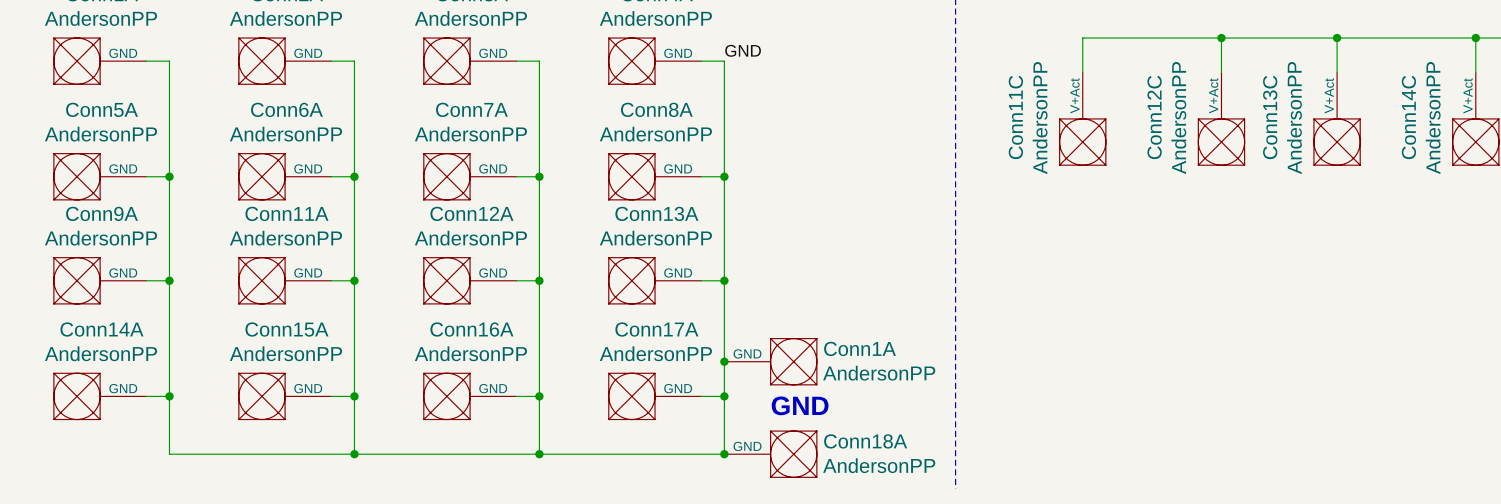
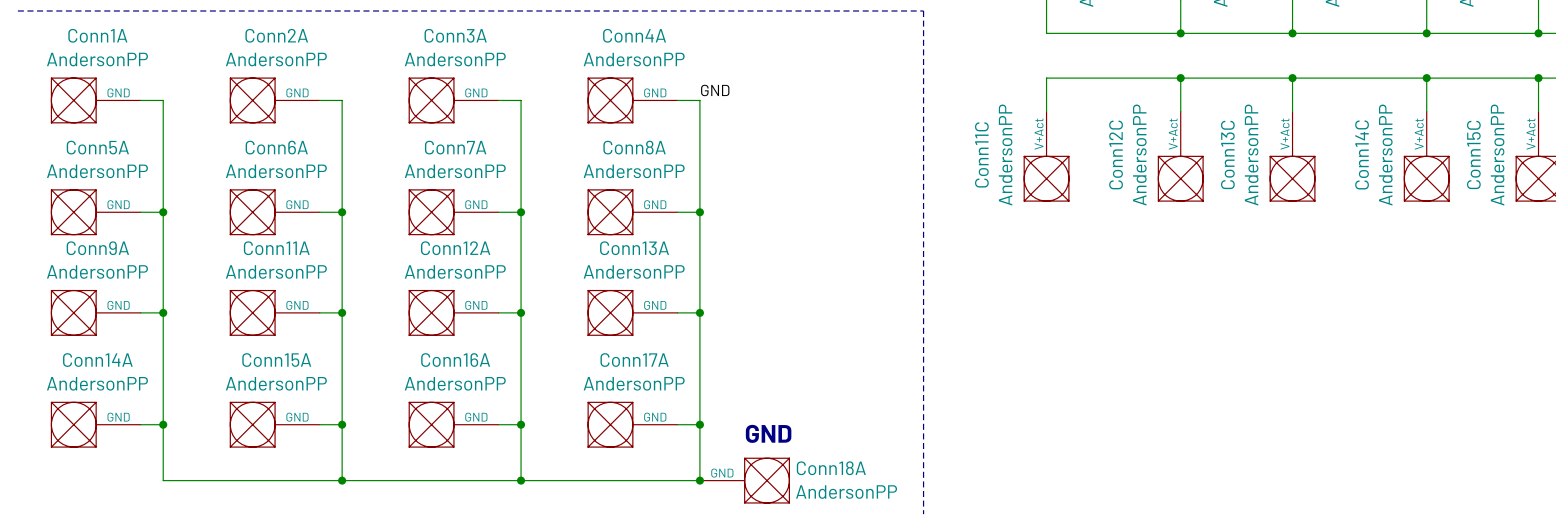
junction: (724, 361) -> none
Conn1A: AndersonPP (770, 361) -> none

